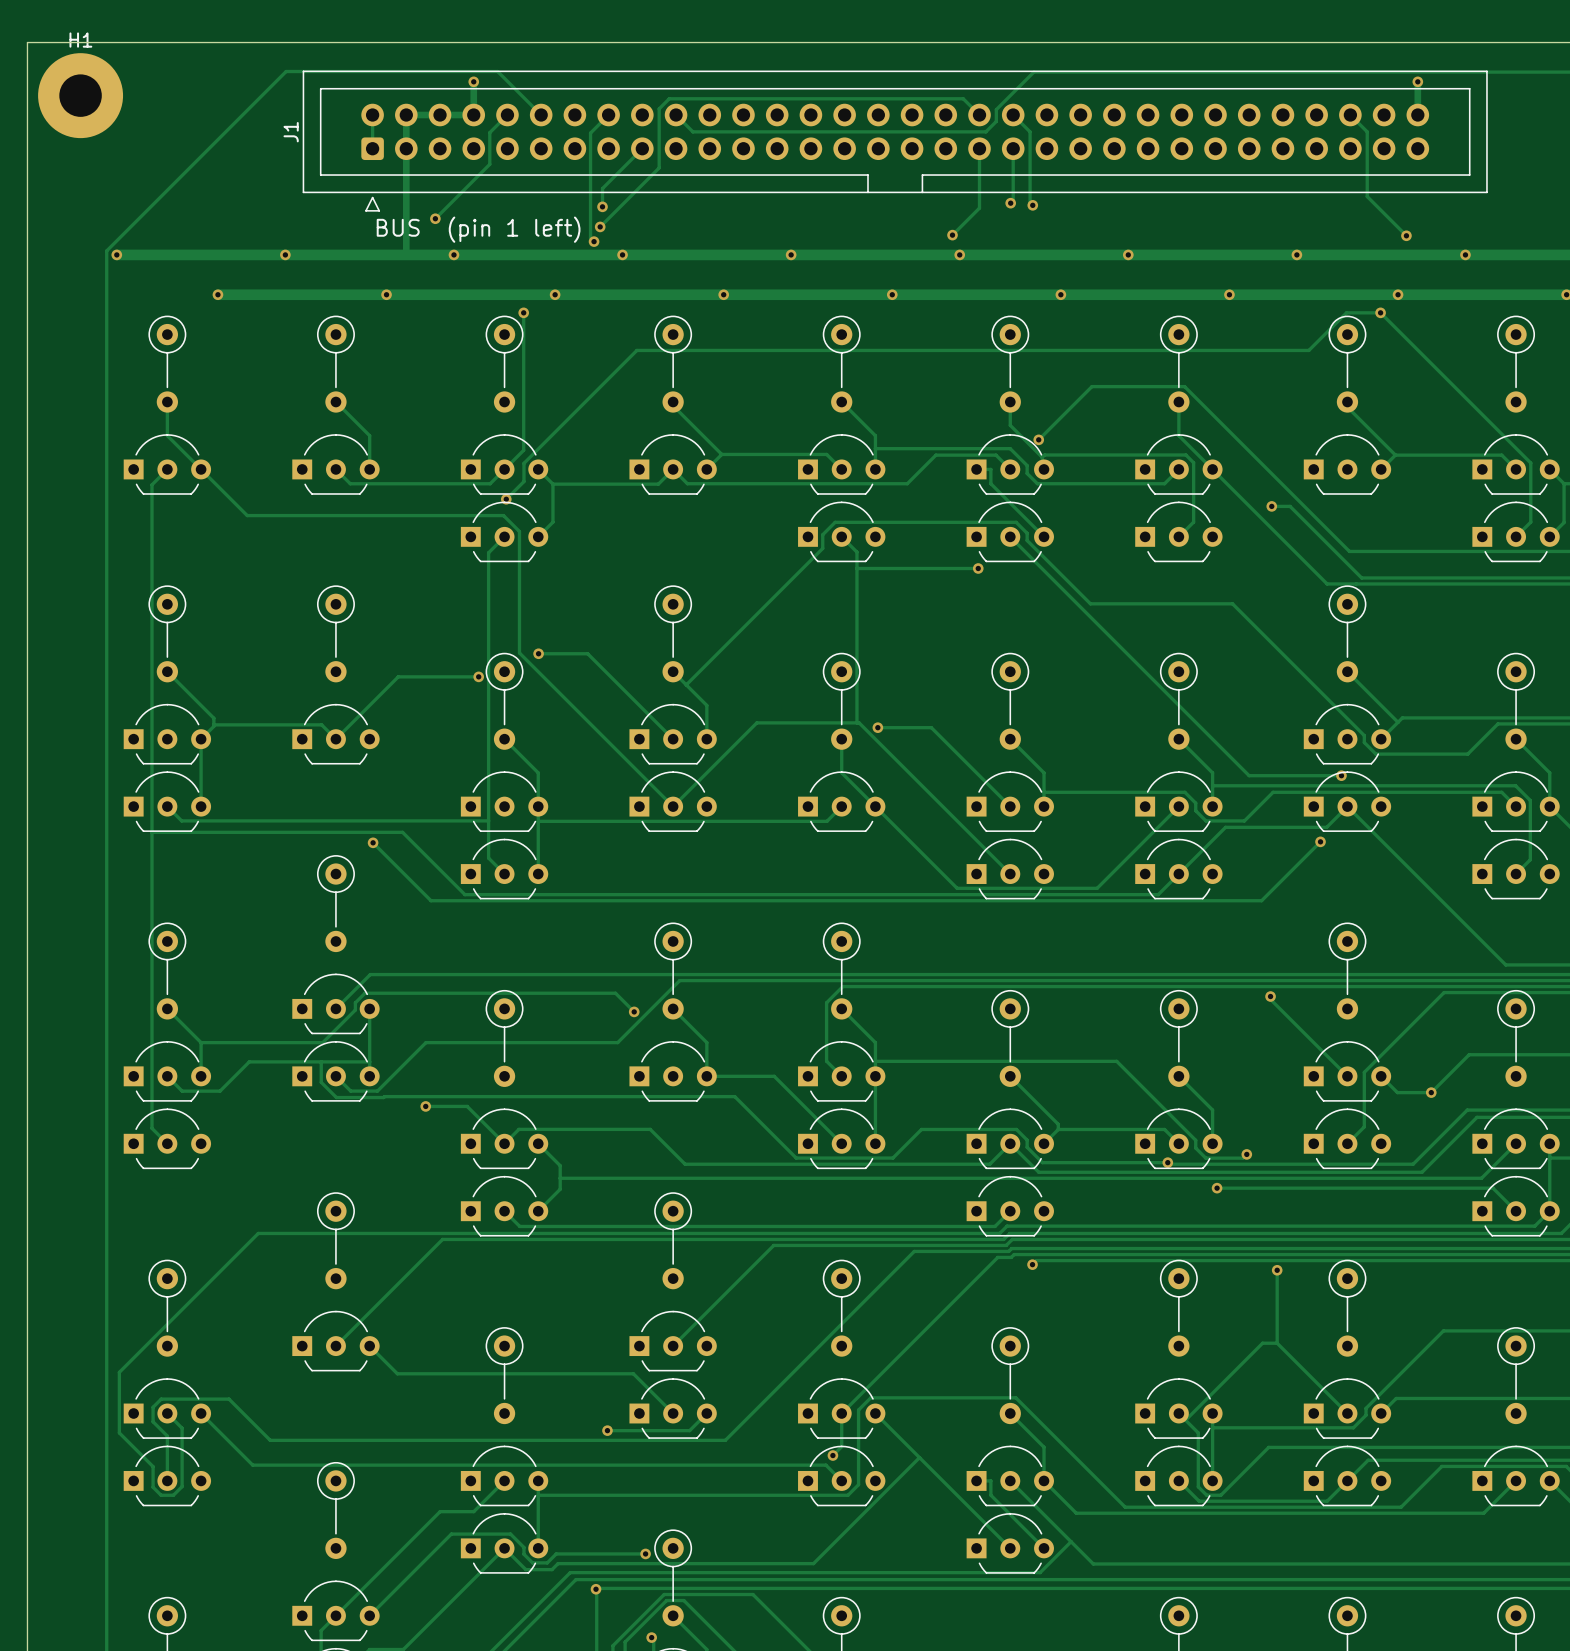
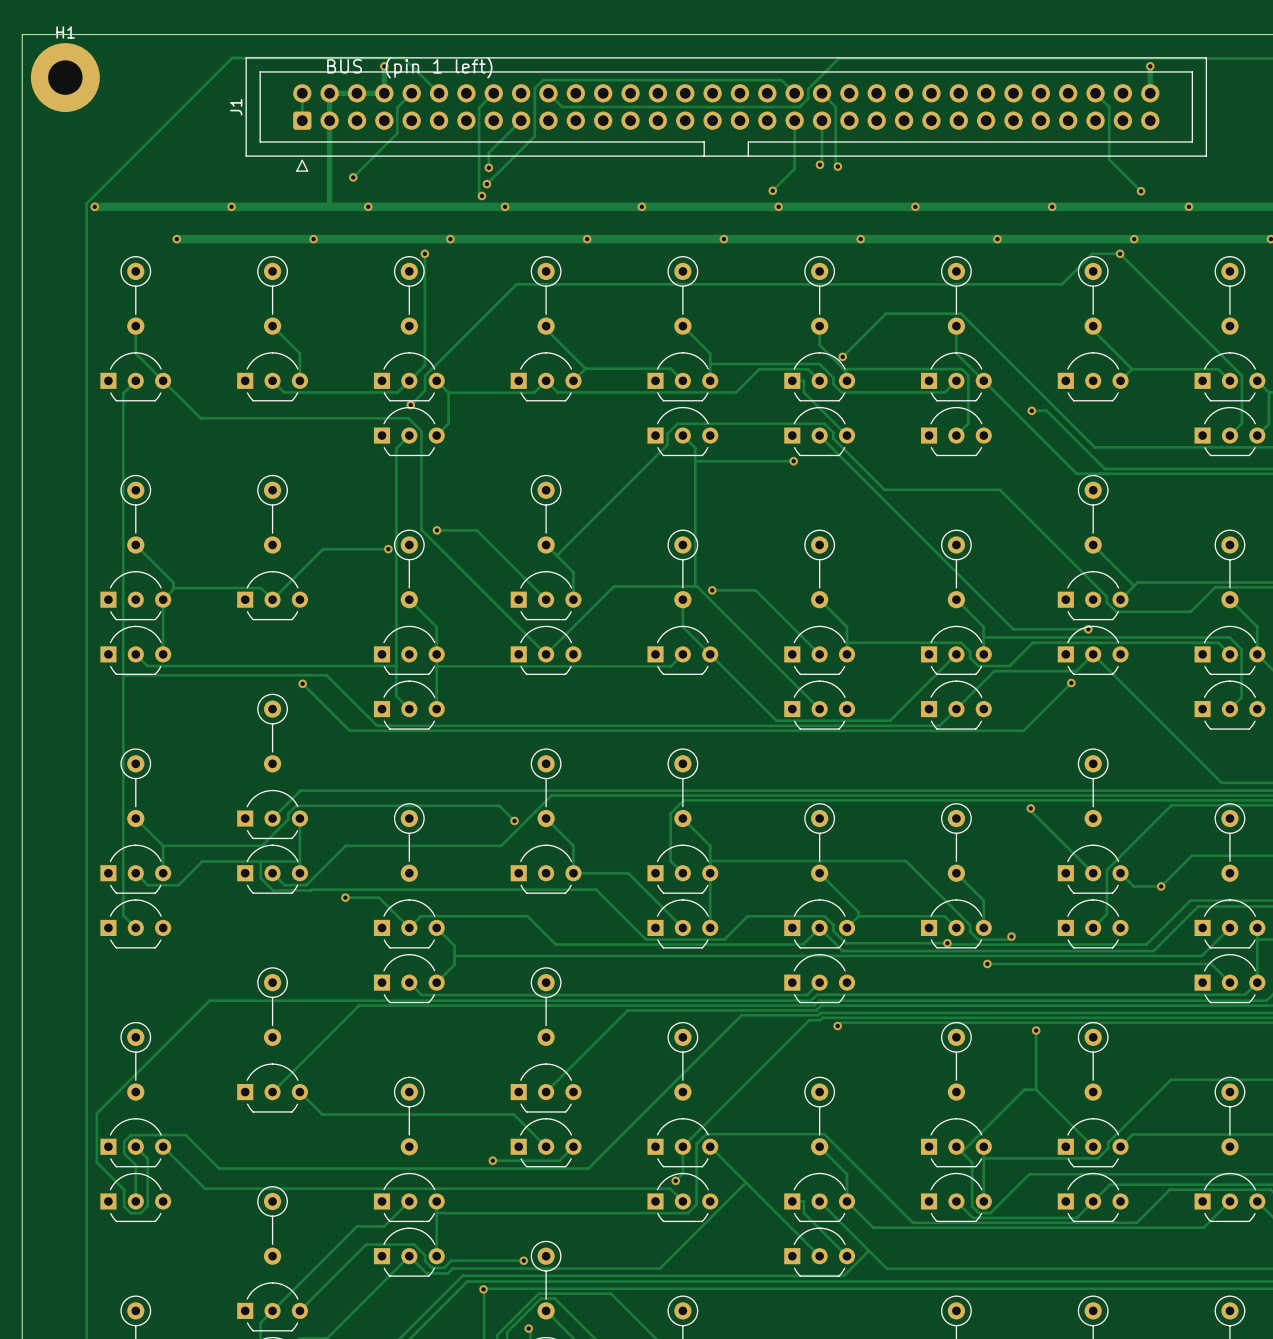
text position: BUS (pin 1 left) (478, 229) -> BUS (pin 1 left) (409, 67)

